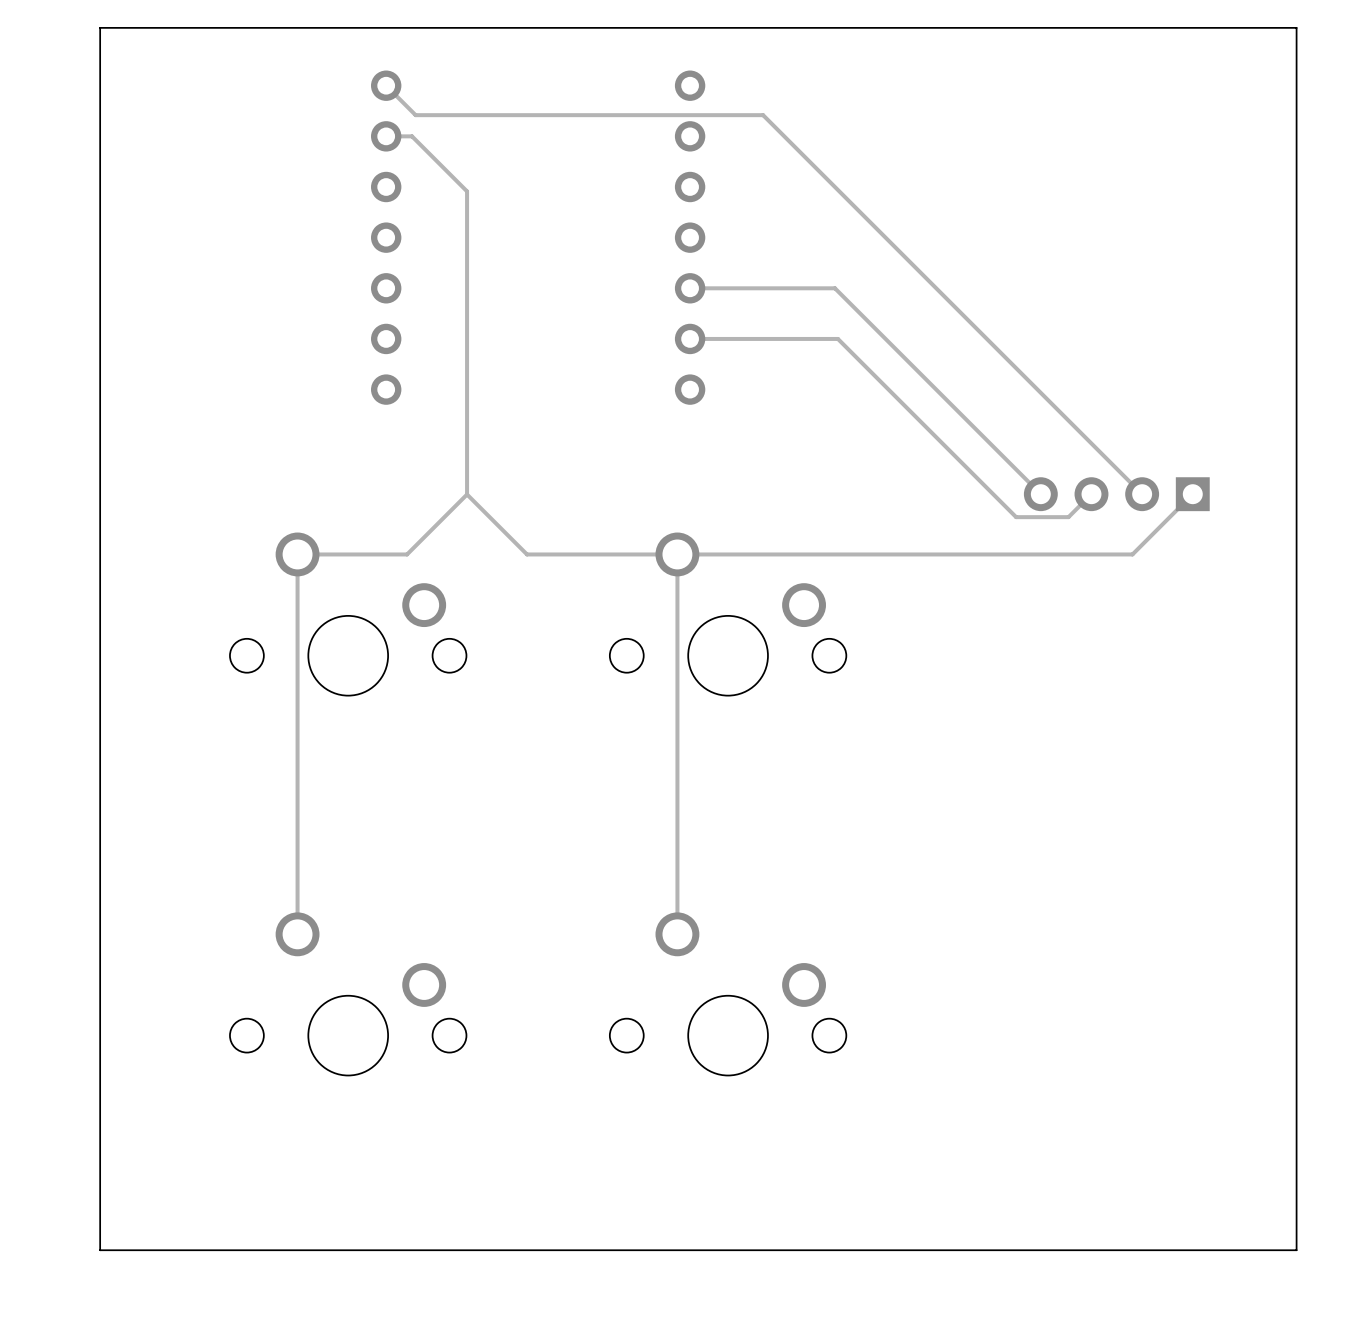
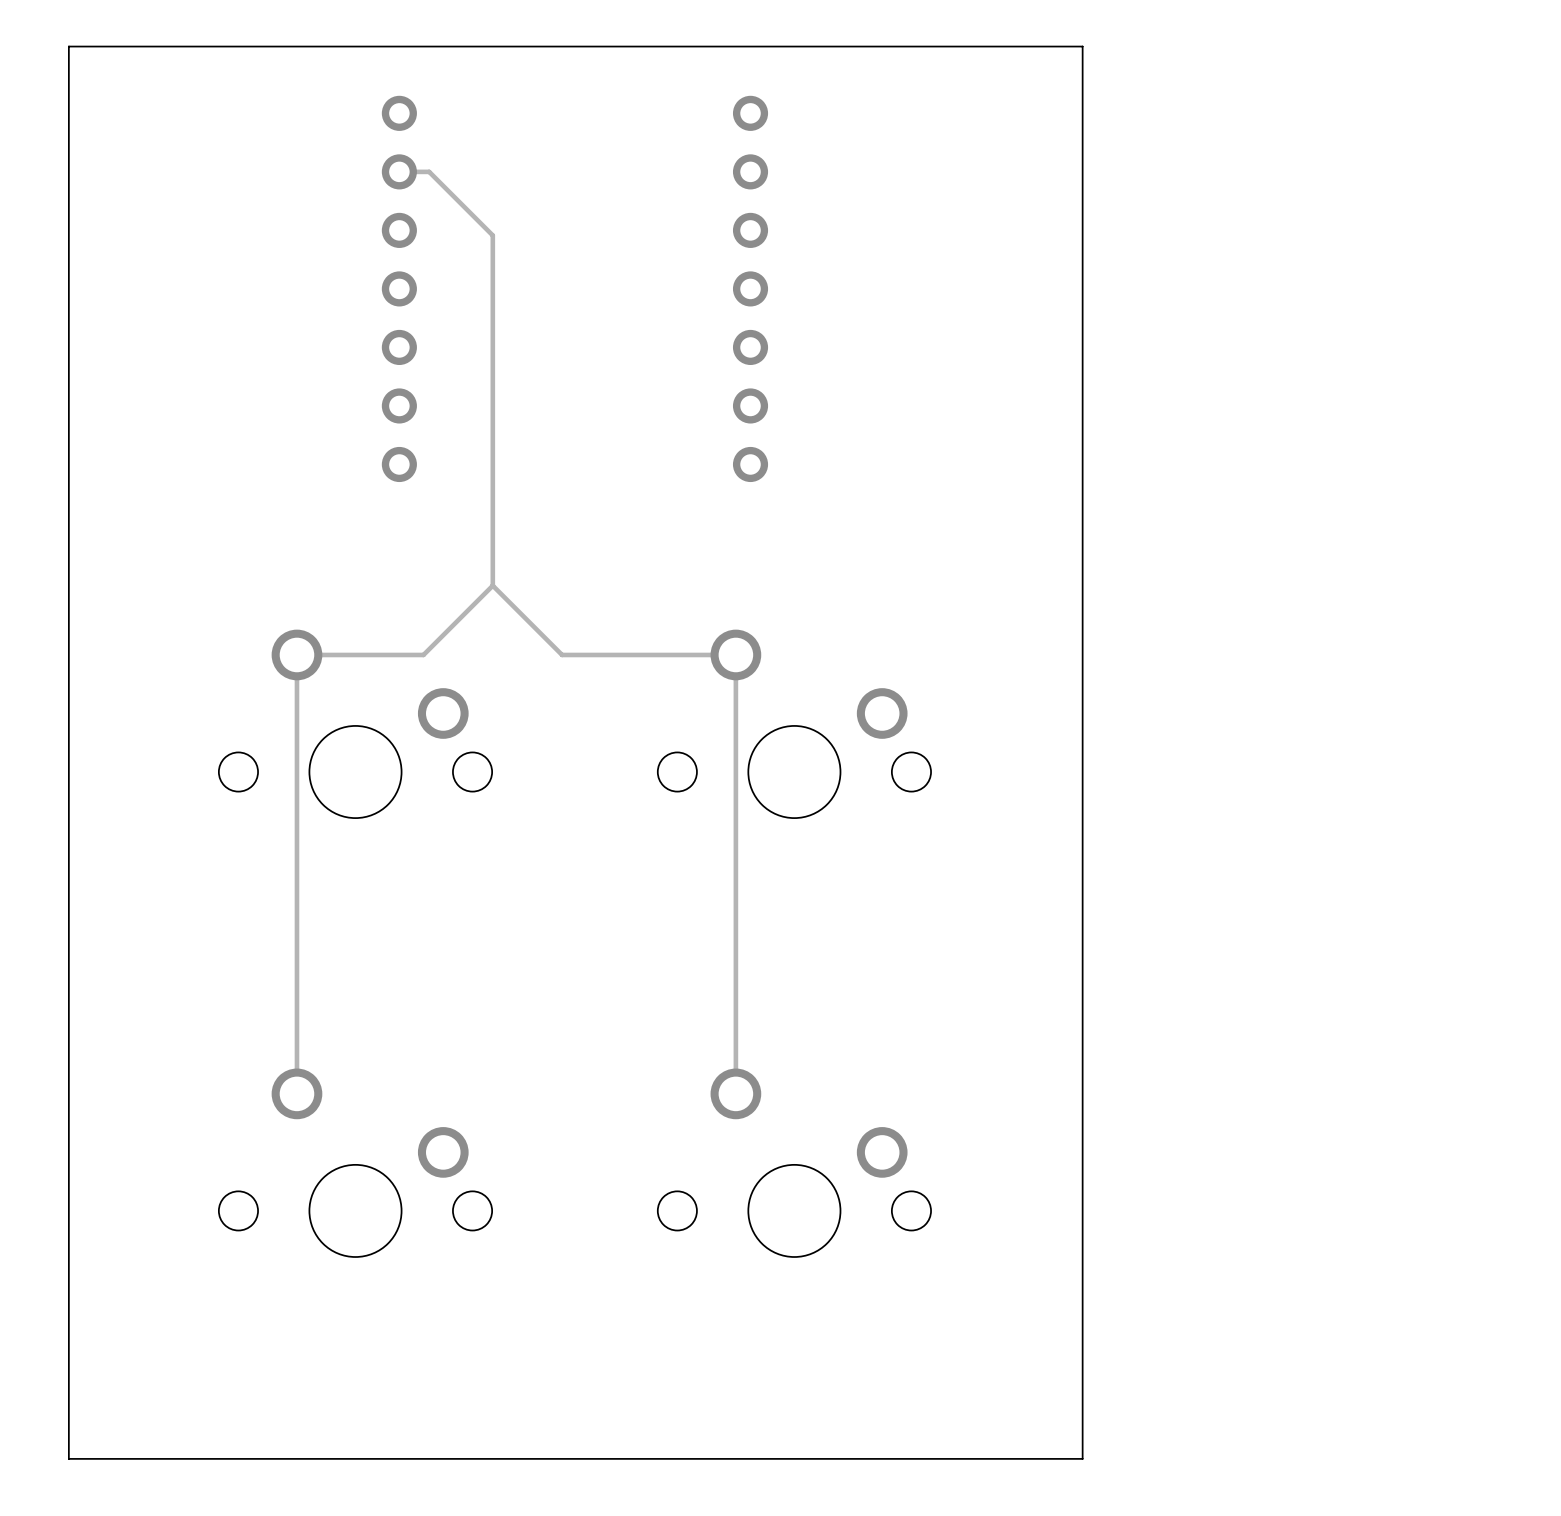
board edge: (977, 27) (1296, 27) (1296, 1250) (977, 1250) -> (1082, 46) (1082, 1458)
track: (386, 85) (415, 115) (763, 115) (1142, 494) -> none
track: (690, 288) (834, 288) (1040, 494) -> none
track: (690, 338) (837, 338) (1016, 517) (1068, 517) (1091, 494) -> none
part: (1116, 494) -> none
track: (1192, 494) (1132, 554) (677, 554) -> none

